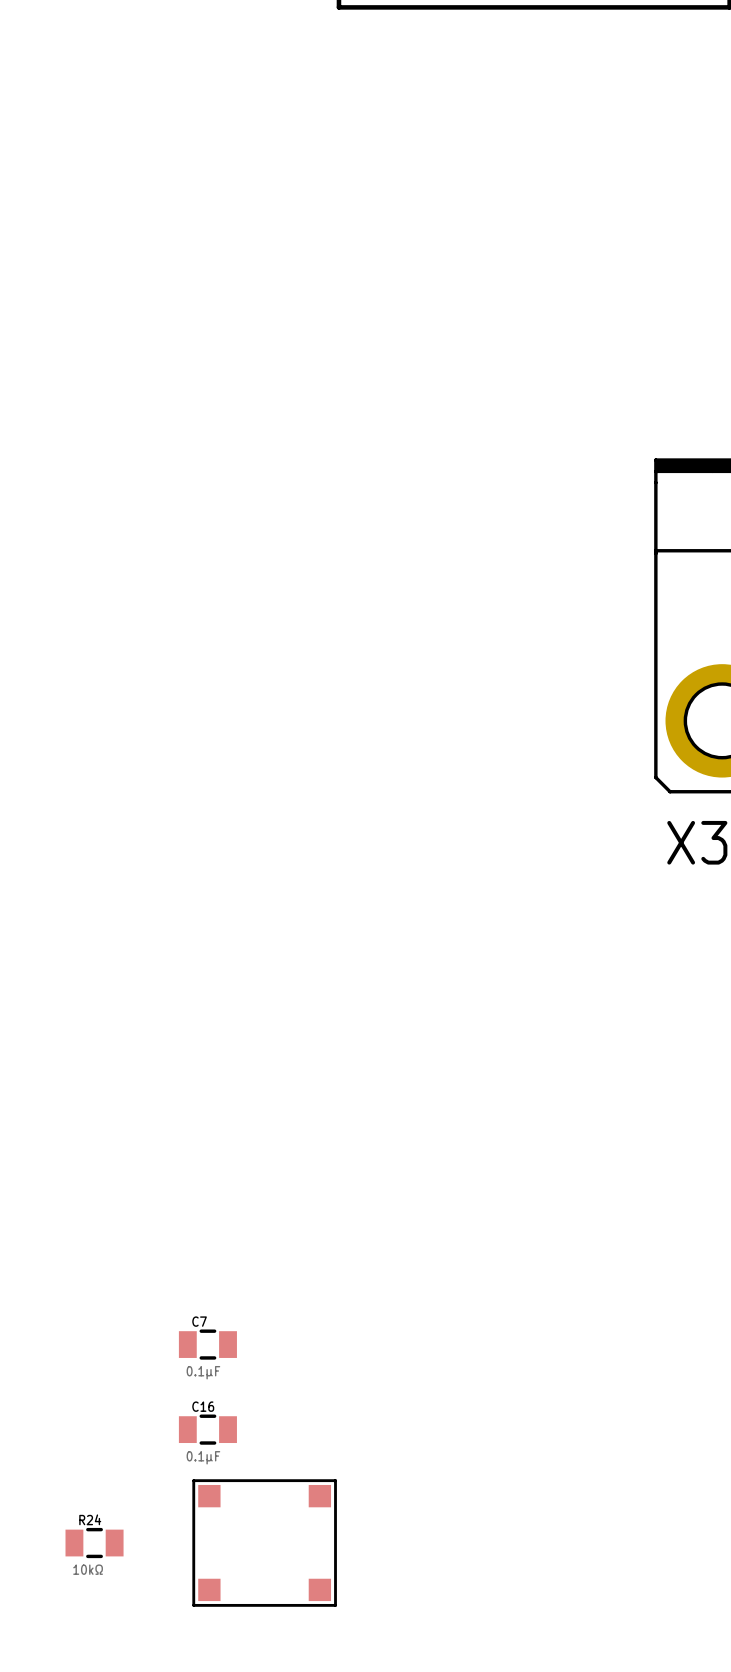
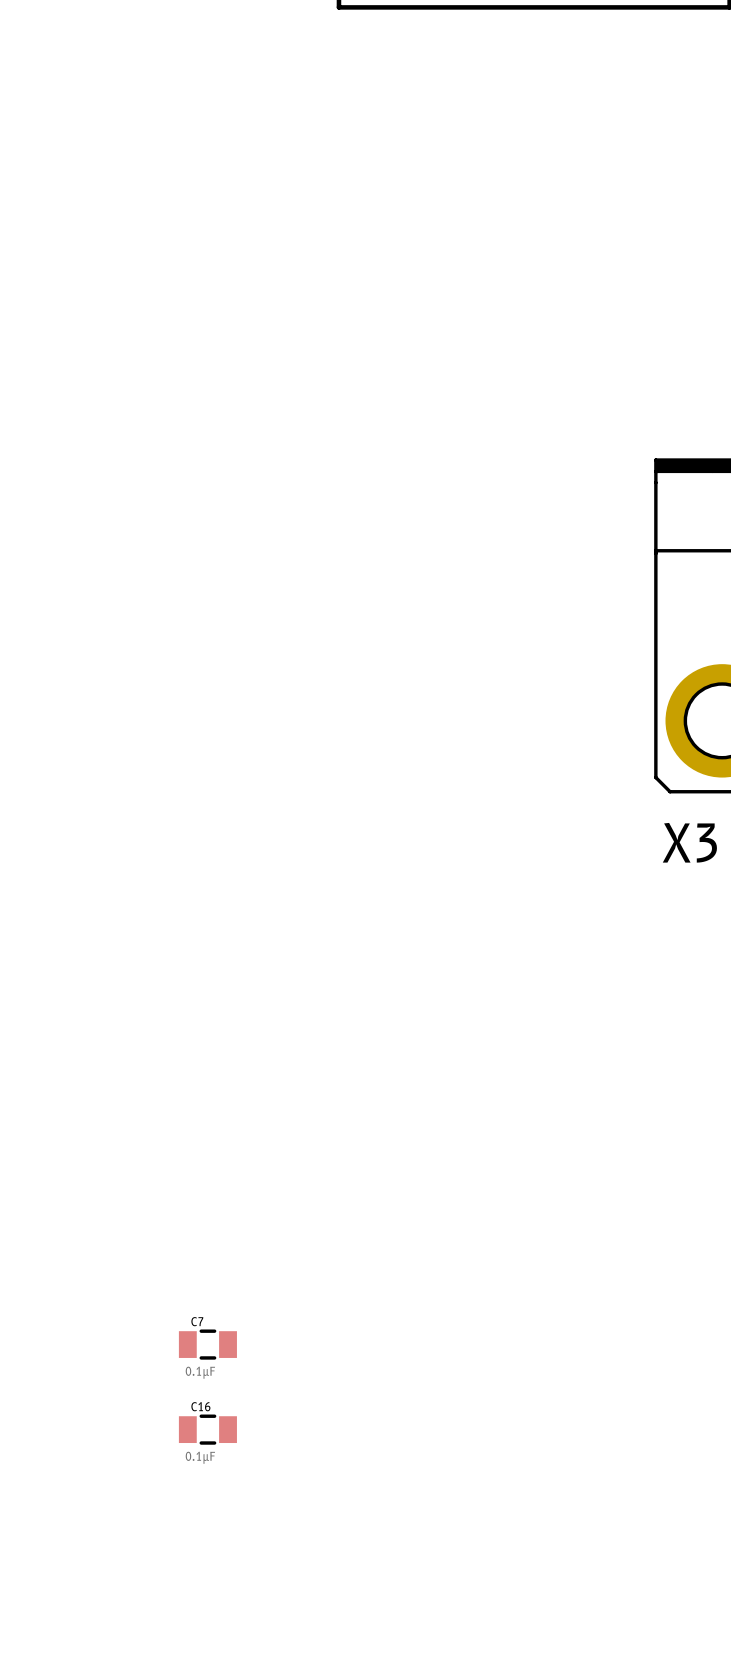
R24: 10kΩ (94, 1543) -> none
part: (264, 1543) -> none

